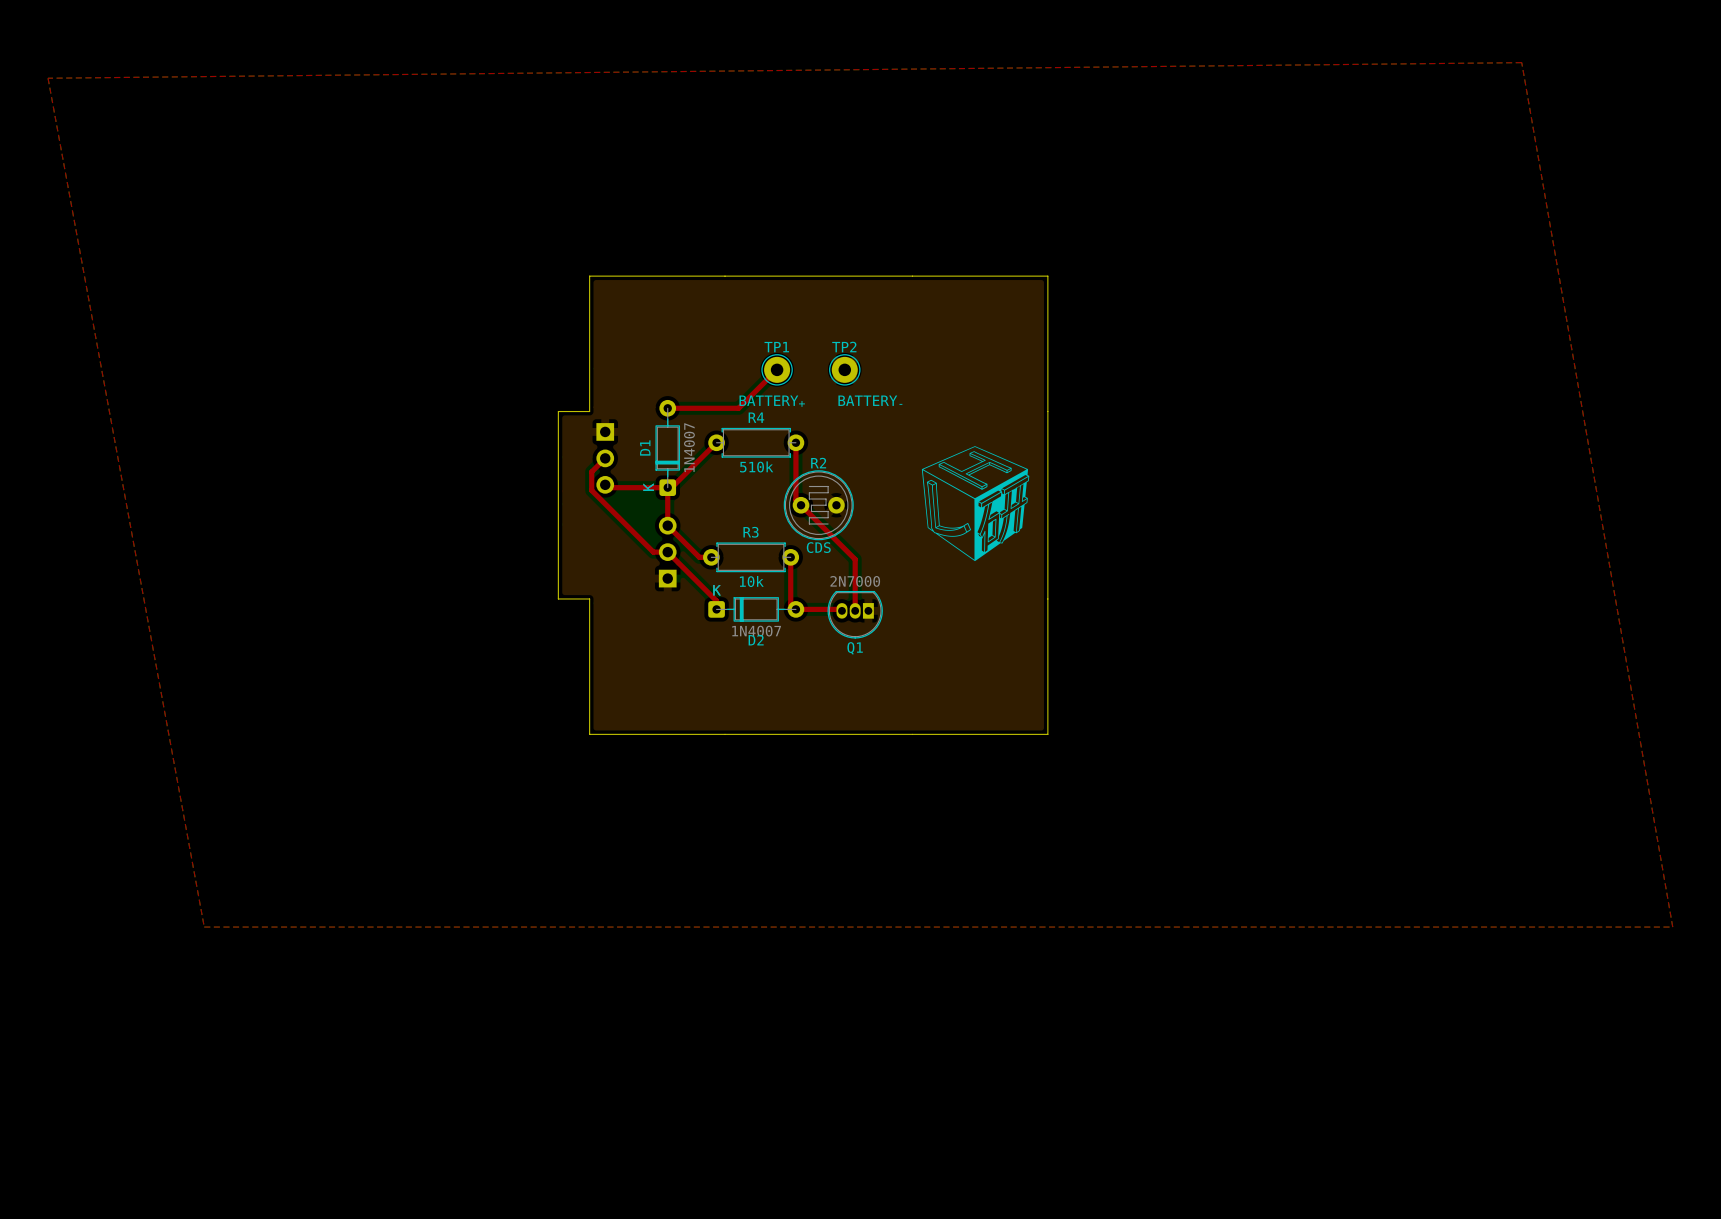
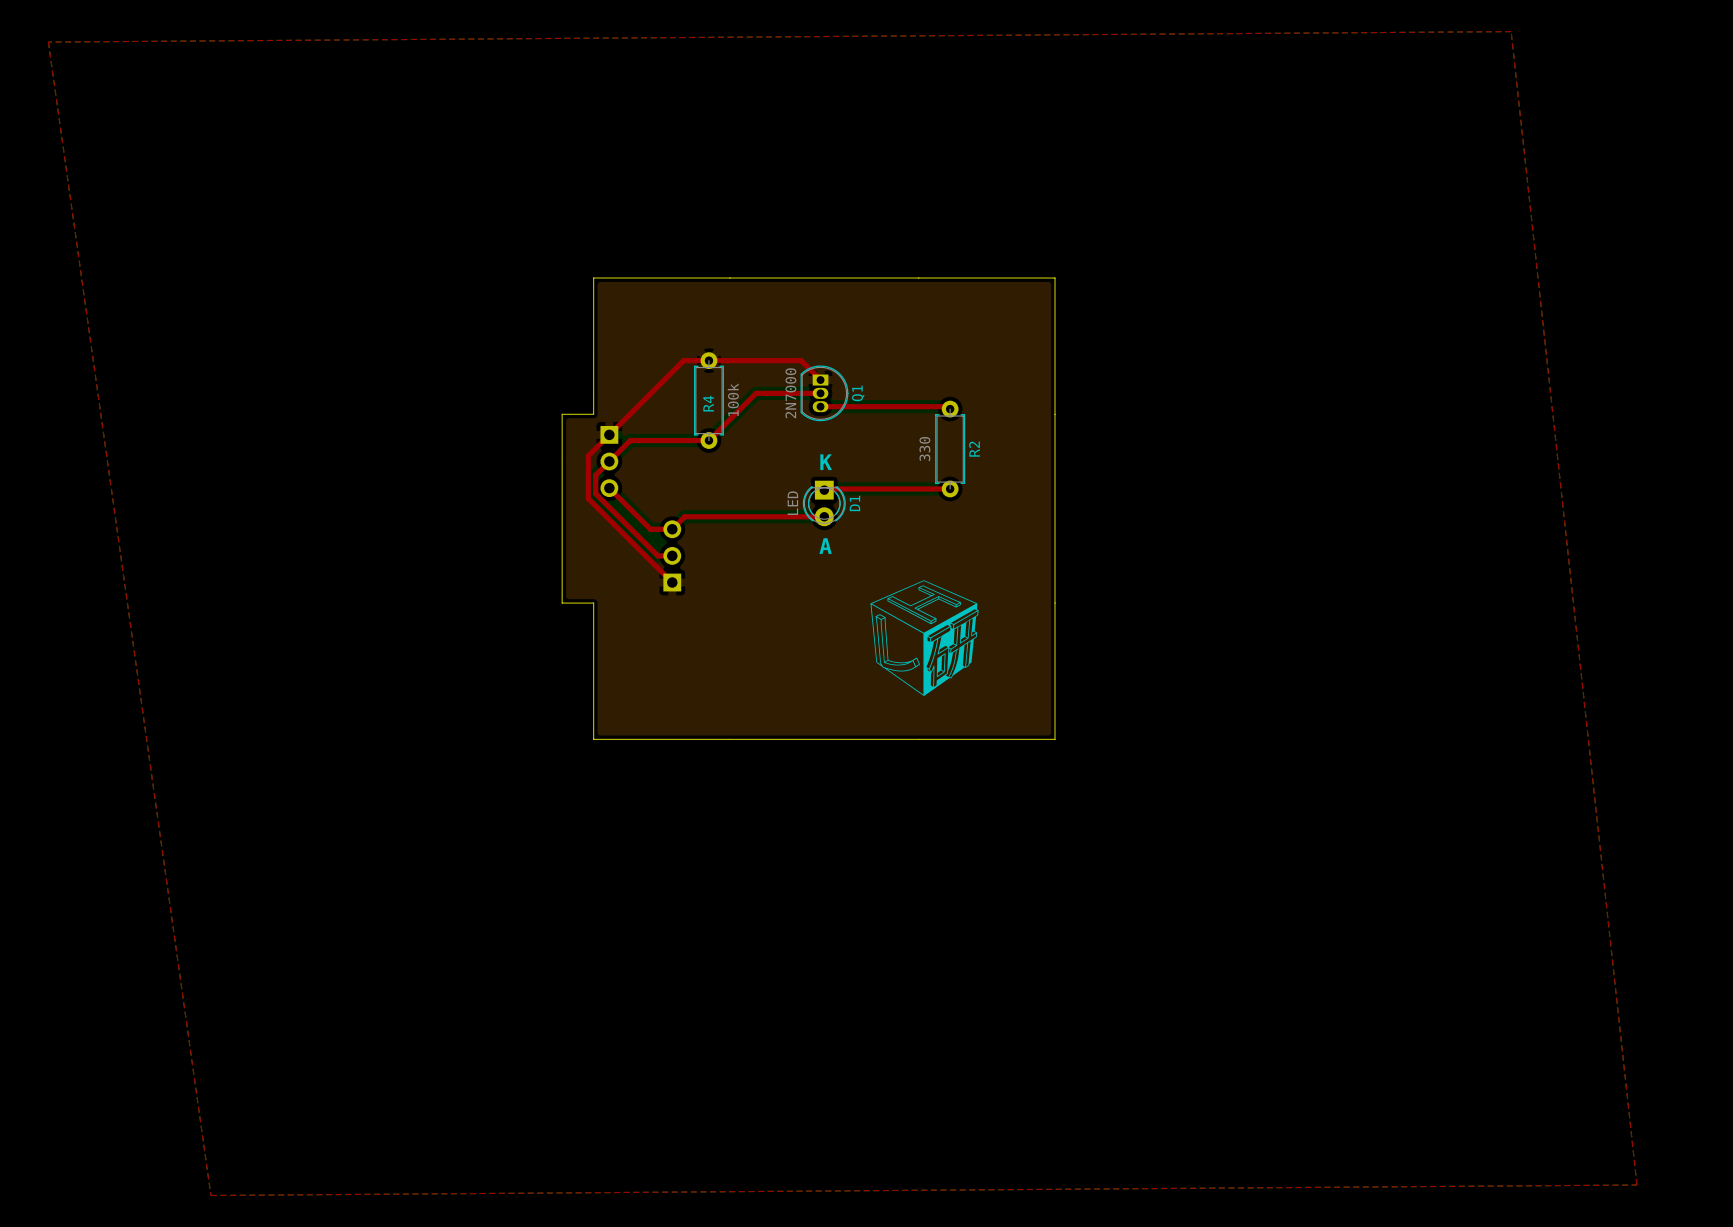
top zone outline: (1521, 62) (1672, 927) (204, 927) (48, 78) (1521, 62) -> (1511, 31) (48, 42) (210, 1195) (1636, 1185) (1511, 31)
top track: (777, 369) (738, 408) (667, 408) -> none
TP1: BATTERY+ (777, 369) -> none
TP2: BATTERY- (844, 369) -> none
top track: none -> (820, 380) (801, 360) (683, 360) (588, 455) (588, 498) (672, 582)
top track: none -> (820, 393) (756, 393) (708, 440) (630, 440) (609, 461)
D1 footprint: [655, 399, 681, 496] -> [802, 480, 846, 527]
top track: none -> (820, 406) (947, 406) (950, 409)
R4 name position: R4 (756, 417) -> R4 (708, 403)
top track: (716, 442) (671, 487) (608, 487) -> (824, 516) (684, 516) (672, 529) (650, 529) (612, 490)
R4 rotation: 0° (756, 442) -> 90° clockwise (708, 400)
R4 position: (756, 442) -> (708, 400)
top track: (795, 442) (795, 500) (855, 559) (855, 610) -> none
D1 name position: D1 (645, 447) -> D1 (854, 503)
D1 value: 1N4007 (689, 447) -> LED (792, 503)
text: none -> K (826, 462)
R2 name position: R2 (818, 463) -> R2 (974, 449)
R4 value: 510k (756, 466) -> 100k (733, 399)
R2 footprint: [783, 470, 854, 541] -> [935, 400, 966, 498]
top track: none -> (950, 488) (824, 490)
top track: (667, 487) (667, 525) (699, 557) (711, 557) -> none
drawing position: (975, 503) -> (924, 638)
text: none -> A (825, 546)
R2 value: CDS (818, 547) -> 330 (924, 449)
top track: (667, 552) (716, 600) (716, 609) -> none
R3: 10k (751, 557) -> none
top track: (790, 557) (790, 604) (795, 609) (841, 610) -> none
D2: 1N4007 (756, 609) -> none
Q1 rotation: 0° (855, 614) -> 90° counterclockwise (824, 393)
Q1 position: (855, 614) -> (824, 393)

